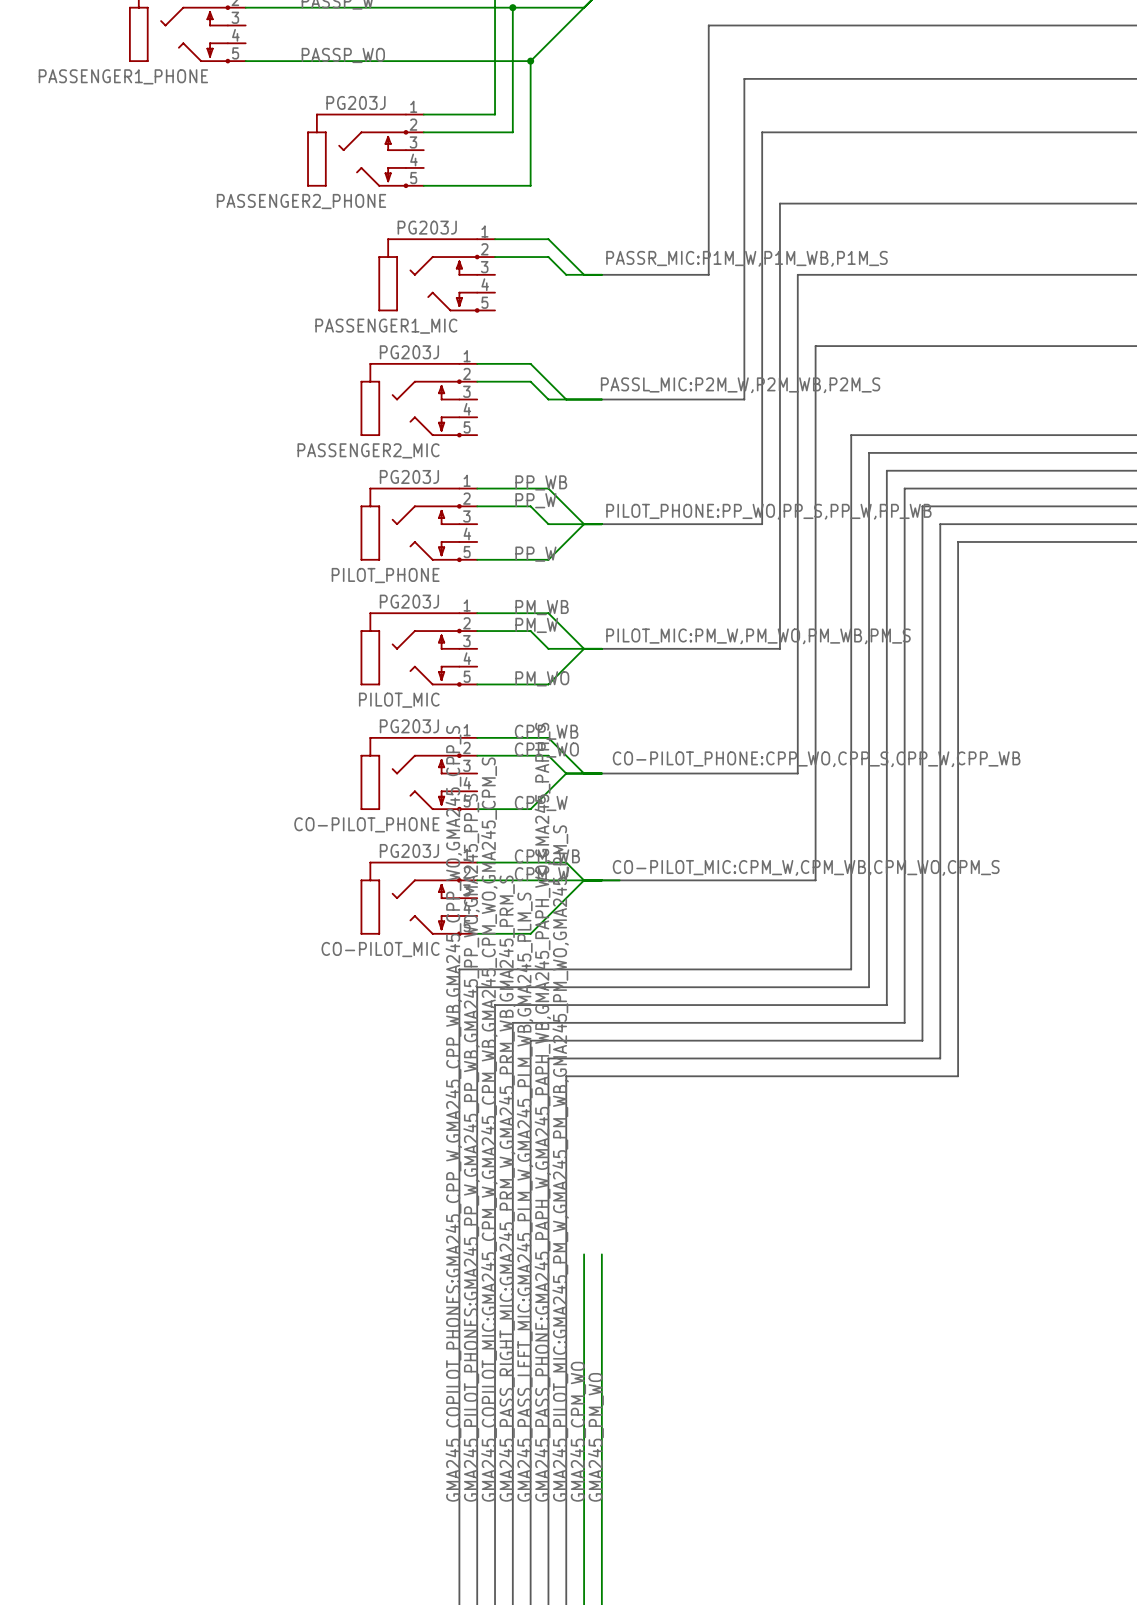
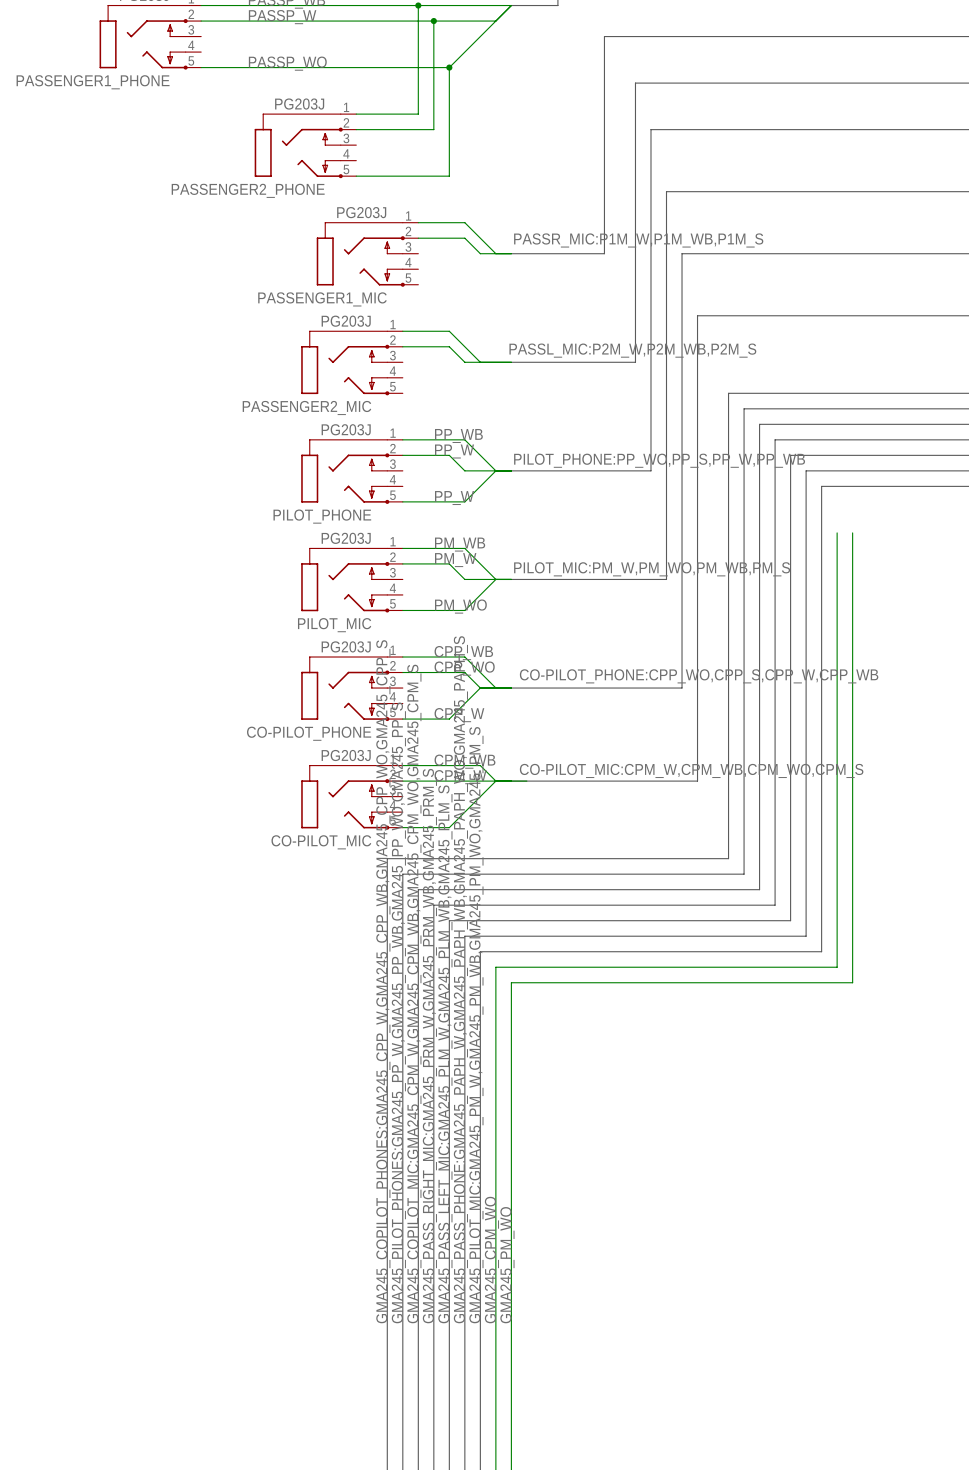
wire: none -> (837, 532) (837, 967) (495, 967) (495, 1106)
wire: none -> (852, 532) (852, 982) (511, 982) (511, 1106)

